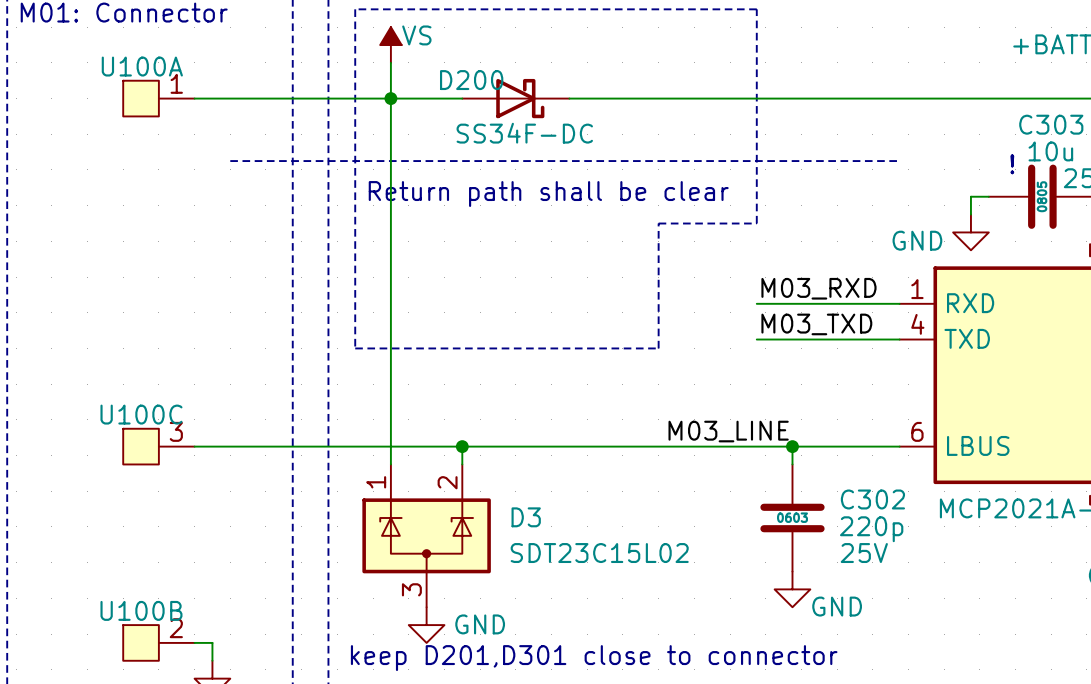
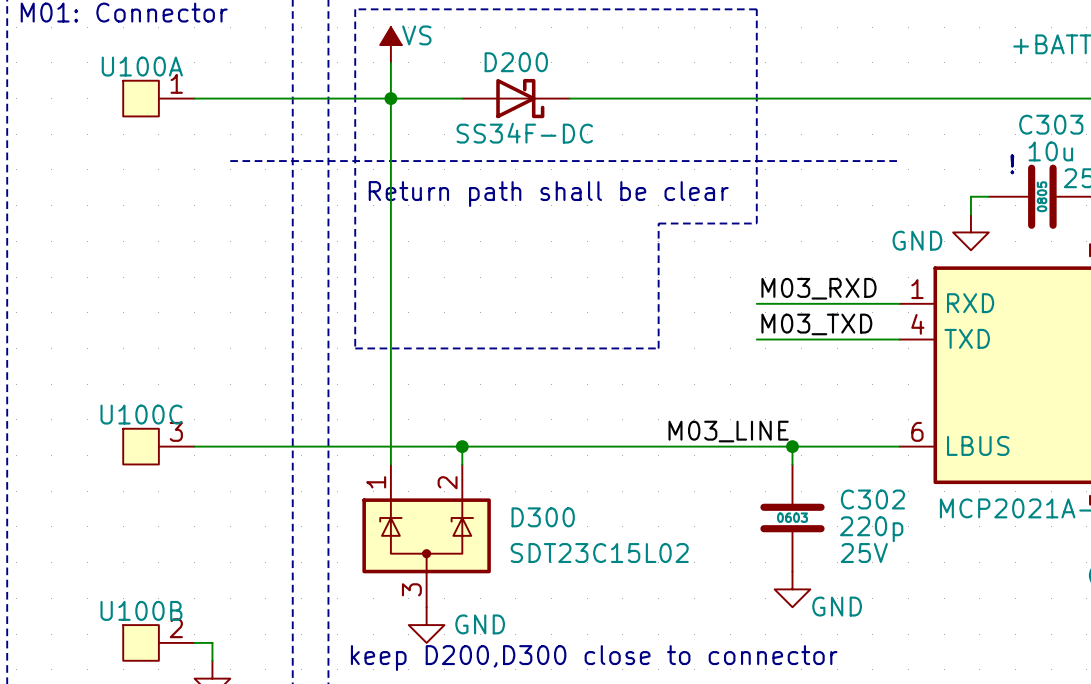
D200 name position: D200 (471, 80) -> D200 (516, 62)
D3 name: D3 (526, 517) -> D300 (543, 517)
text: keep D201,D301 close to connector (594, 658) -> keep D200,D300 close to connector (594, 658)

